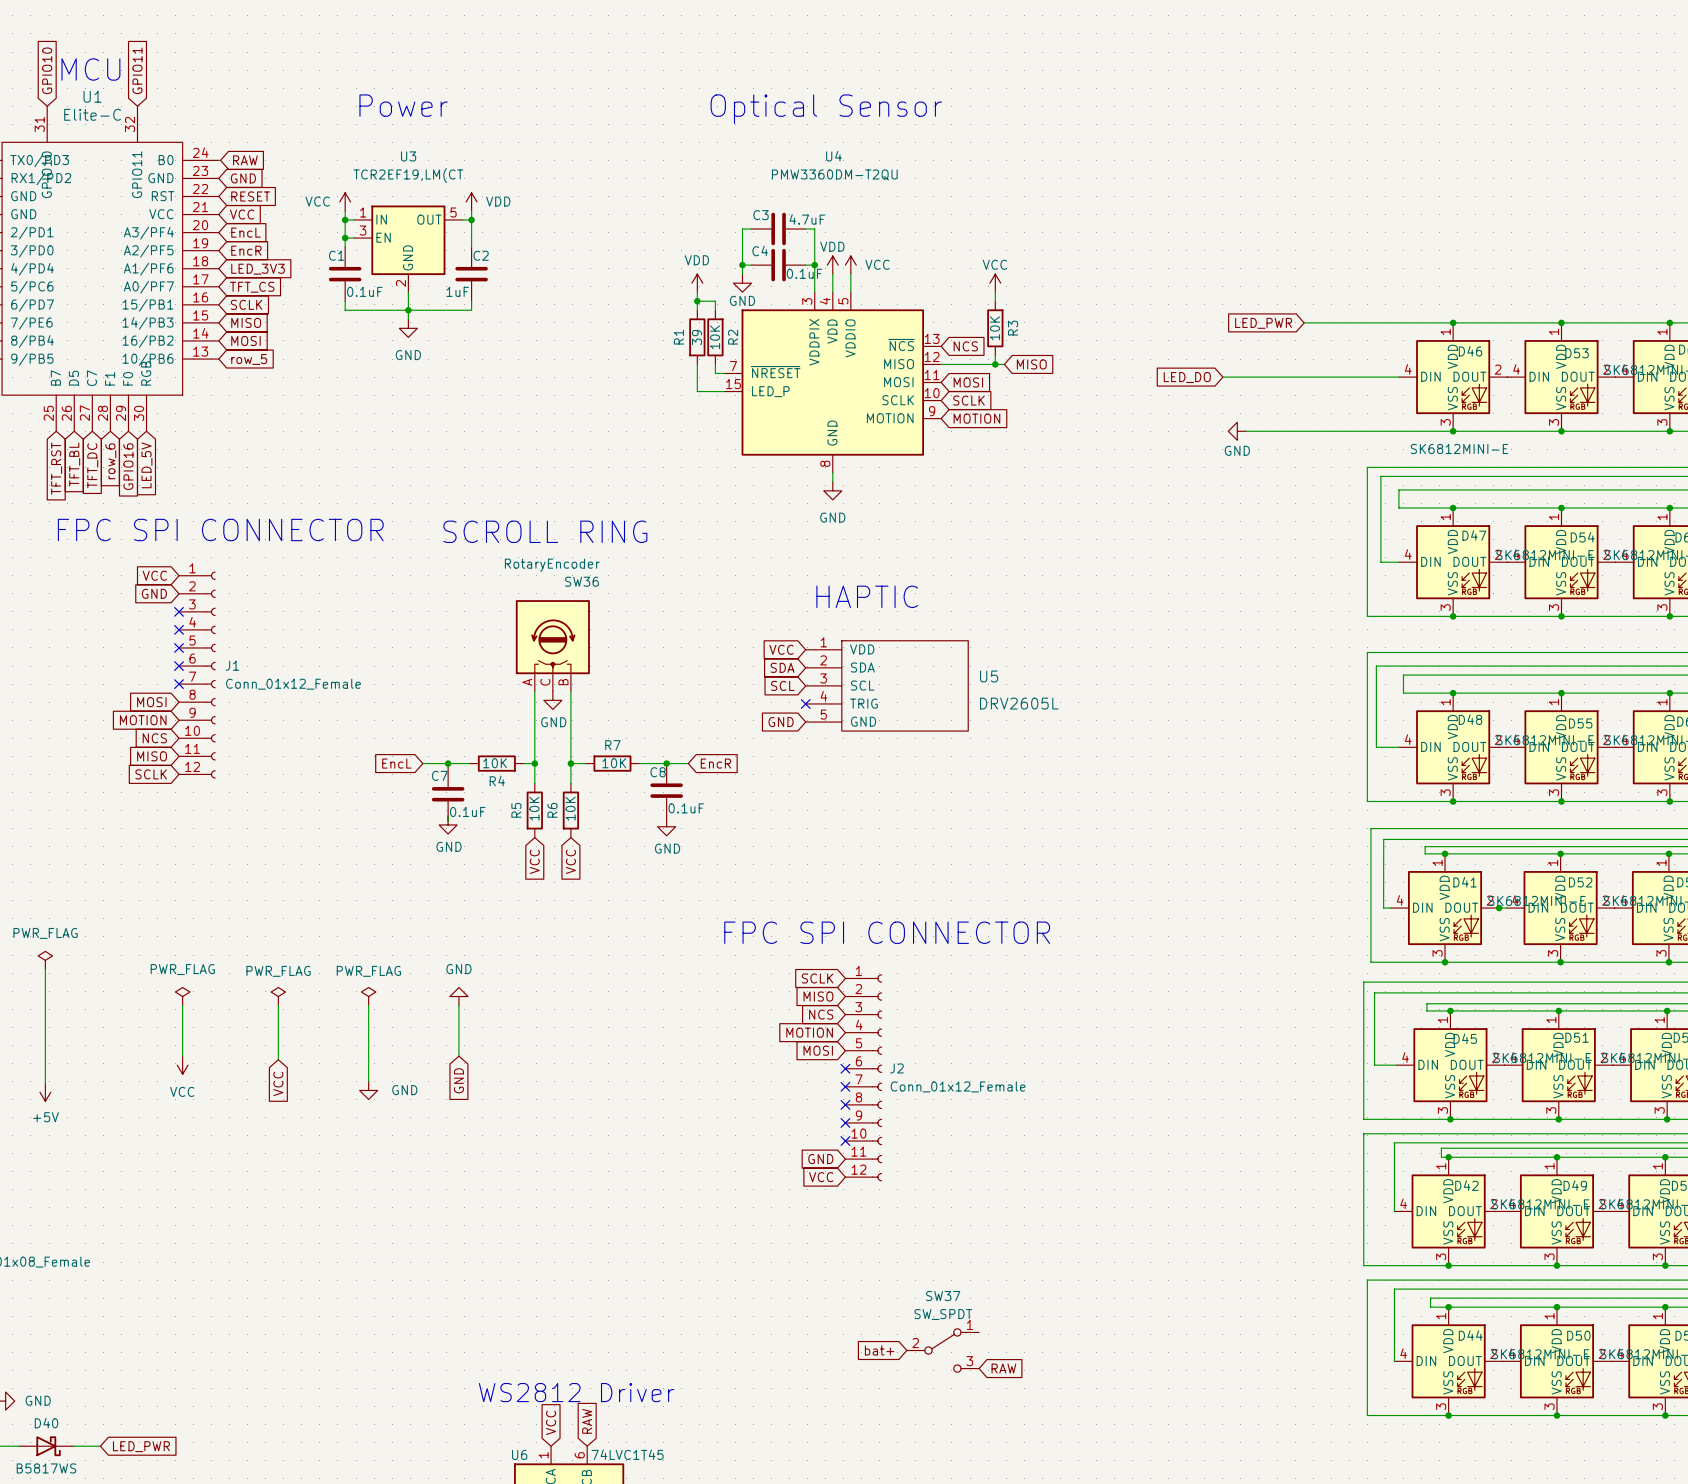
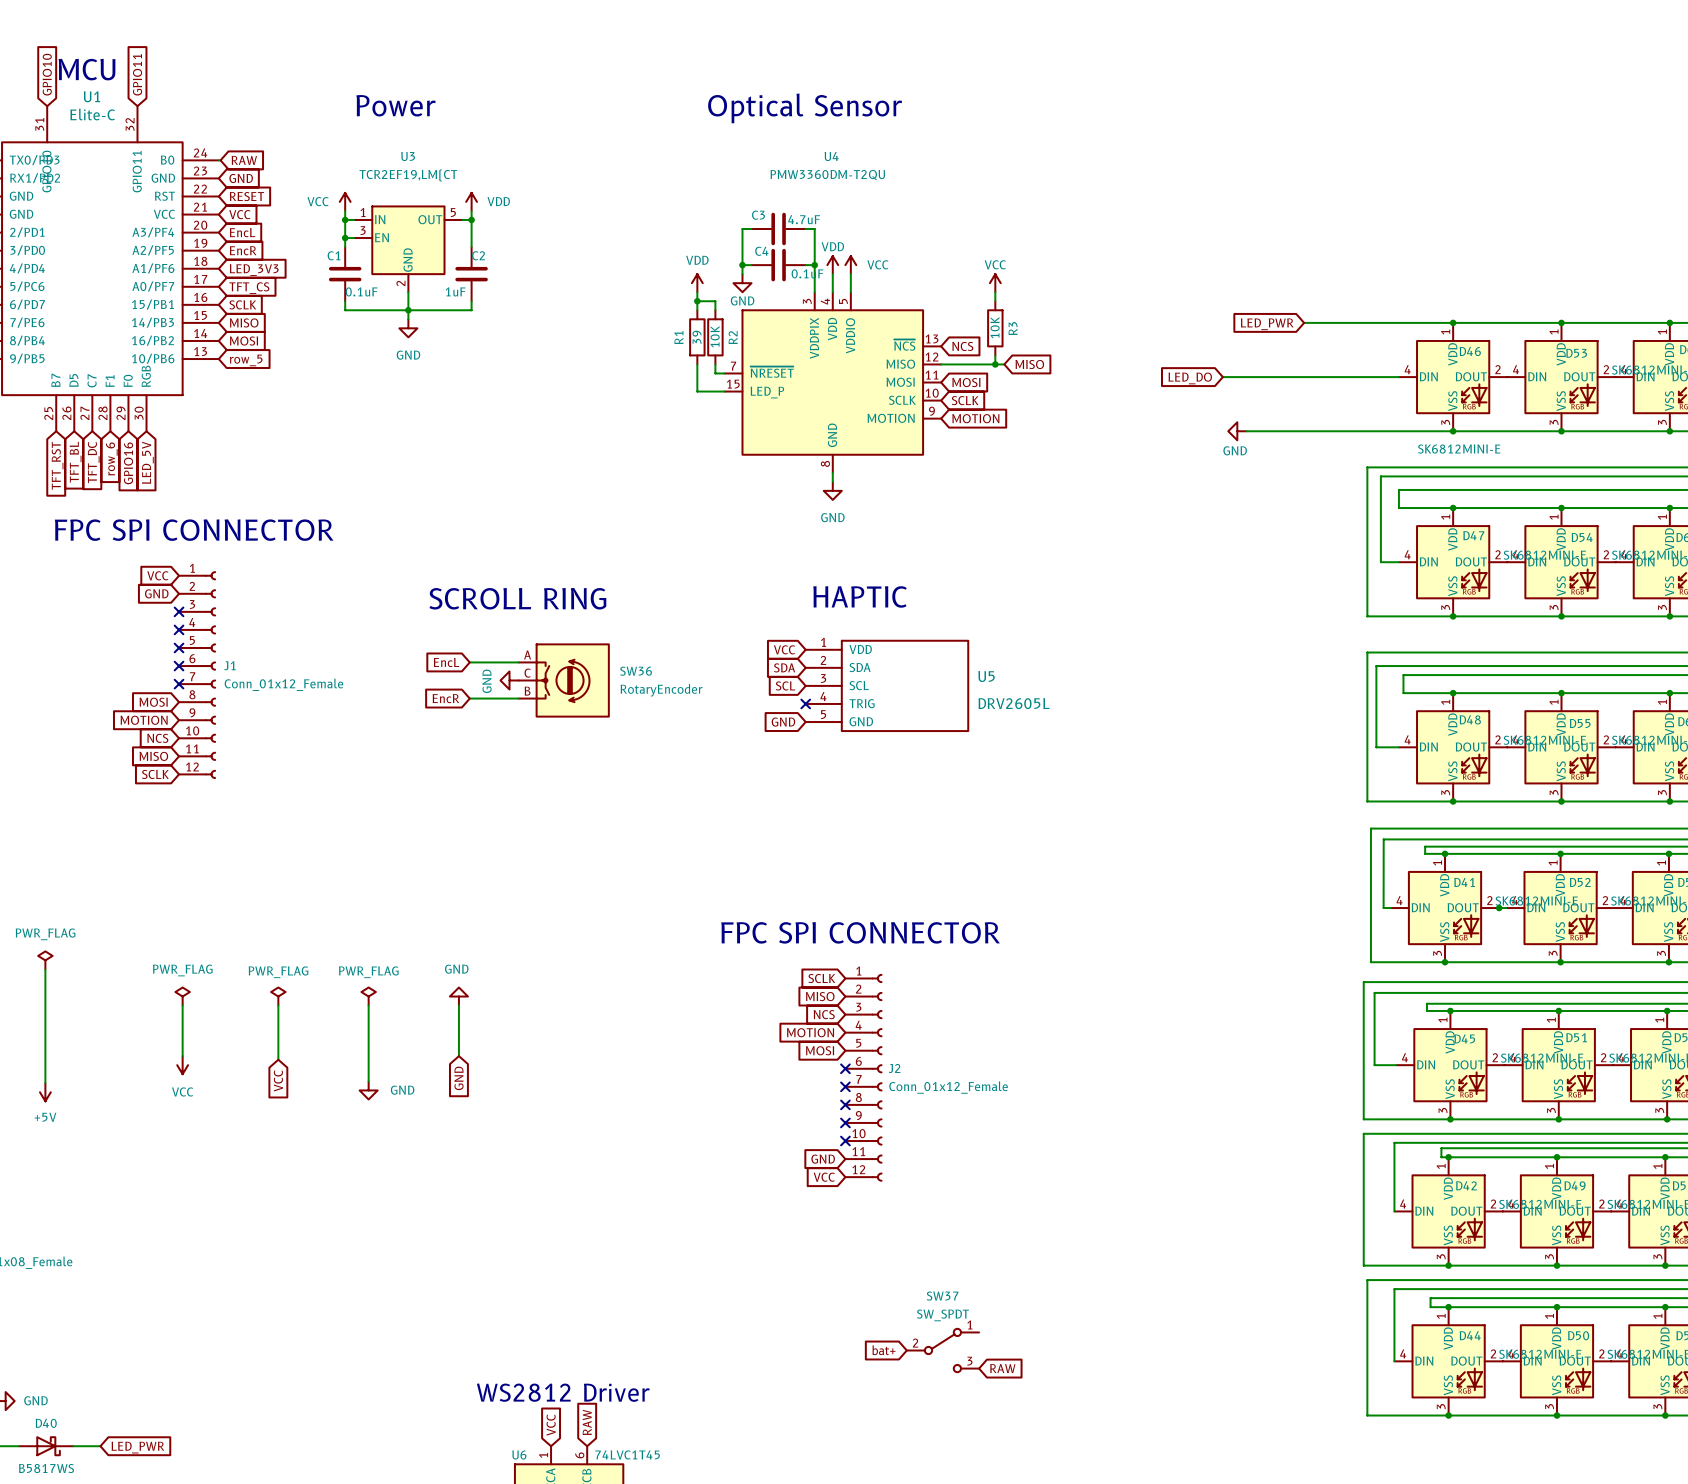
text position: SCROLL RING (545, 531) -> SCROLL RING (517, 598)
SW36 value position: RotaryEncoder (552, 565) -> RotaryEncoder (661, 690)
SW36 name position: SW36 (581, 581) -> SW36 (636, 671)
SW36 rotation: 0° (552, 637) -> 90° clockwise (572, 680)
wire: none -> (469, 662) (518, 662)
wire: (534, 691) (534, 783) -> none
wire: (570, 691) (570, 783) -> none
global label: none -> EncR (445, 698)
wire: none -> (469, 698) (518, 698)
power symbol rotation: 0° (552, 700) -> 90° clockwise (509, 680)
power symbol position: GND (552, 700) -> GND (509, 680)
global label position: EncL (396, 763) -> EncL (446, 662)
wire: (422, 763) (469, 763) -> none
junction: (448, 763) -> none
R4: 10K (496, 763) -> none
wire: (523, 763) (534, 763) -> none
junction: (534, 763) -> none
wire: (570, 763) (585, 763) -> none
junction: (570, 763) -> none
R7: 10K (612, 763) -> none
wire: (639, 763) (688, 763) -> none
junction: (666, 763) -> none
global label: EncR (715, 763) -> none
C8: 0.1uF (666, 790) -> none
C7: 0.1uF (448, 794) -> none
R5: 10K (534, 810) -> none
R6: 10K (570, 810) -> none
wire: (448, 815) (448, 821) -> none
power symbol: GND (448, 824) -> none
power symbol: GND (666, 826) -> none
global label: VCC (534, 861) -> none
global label: VCC (570, 861) -> none

